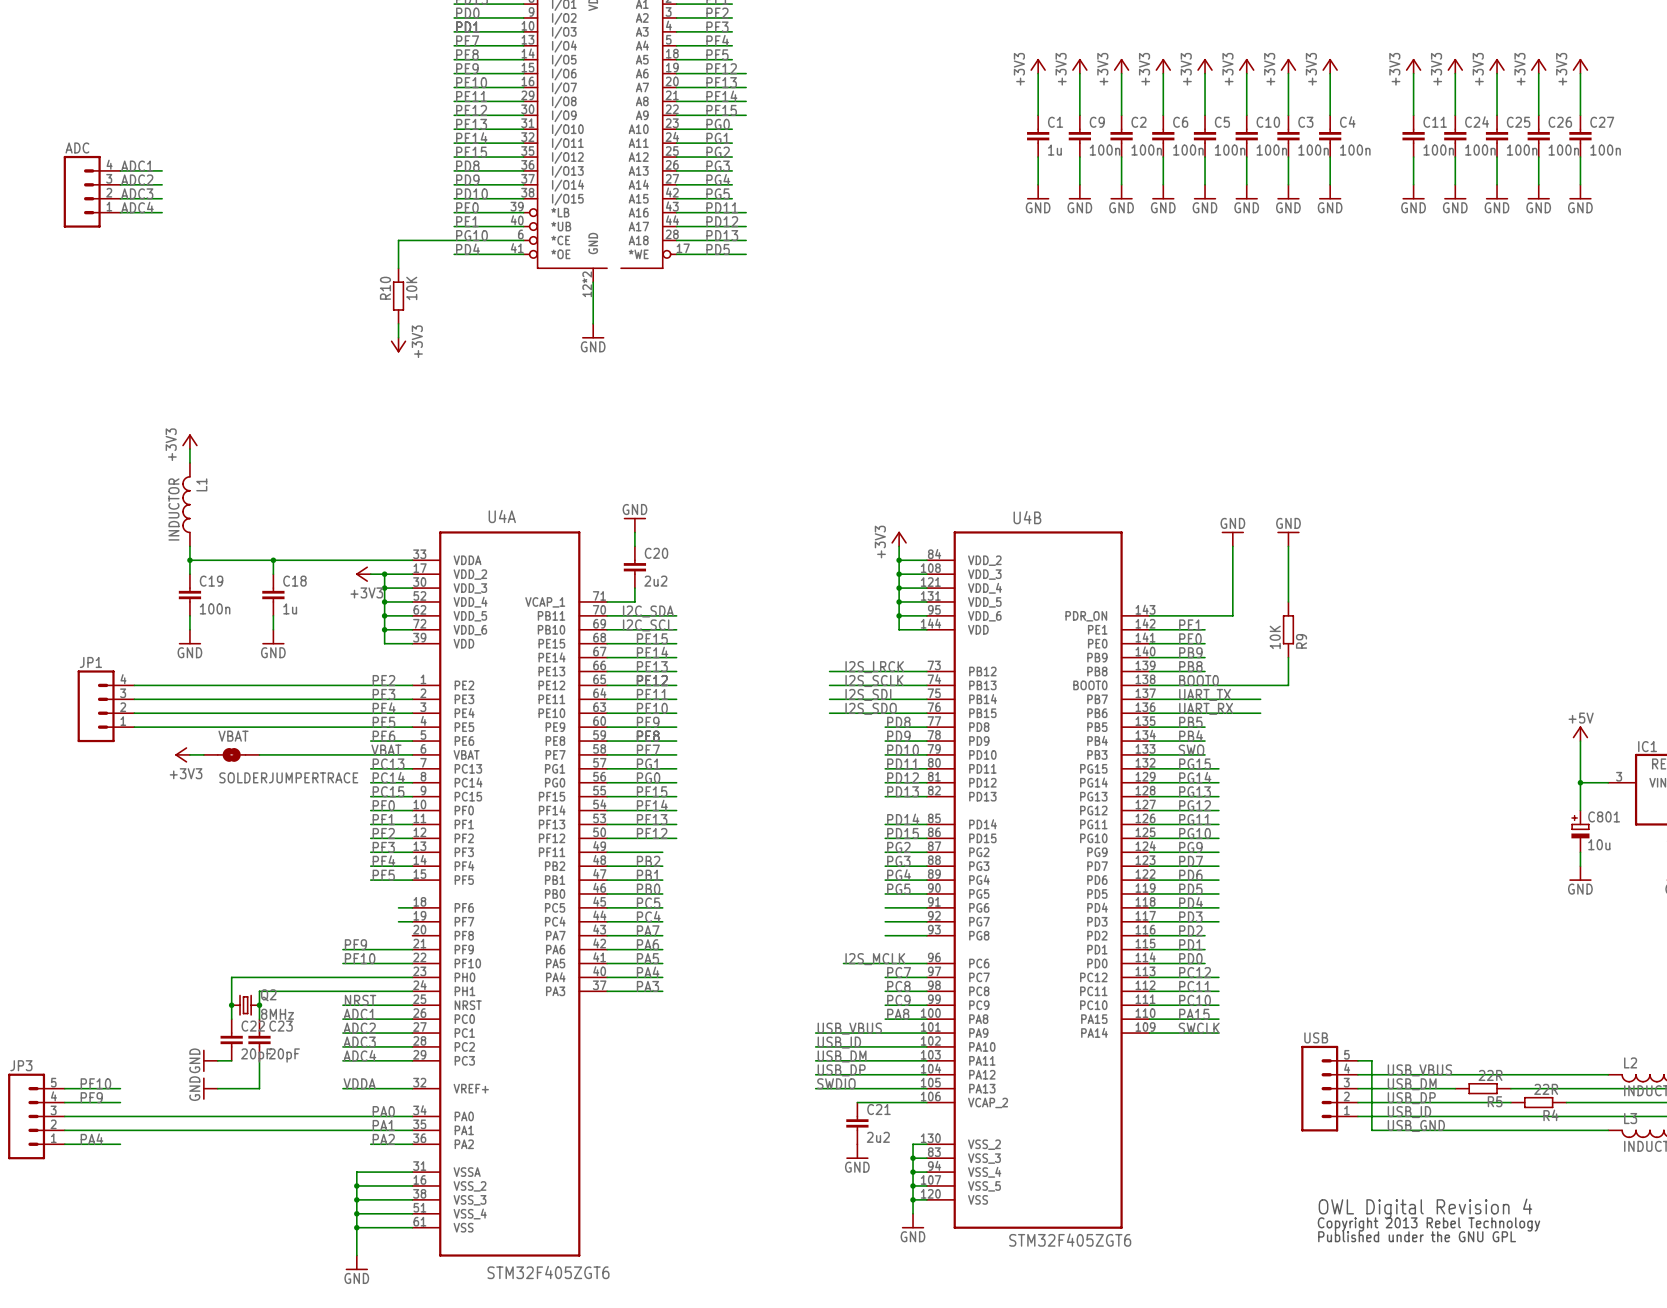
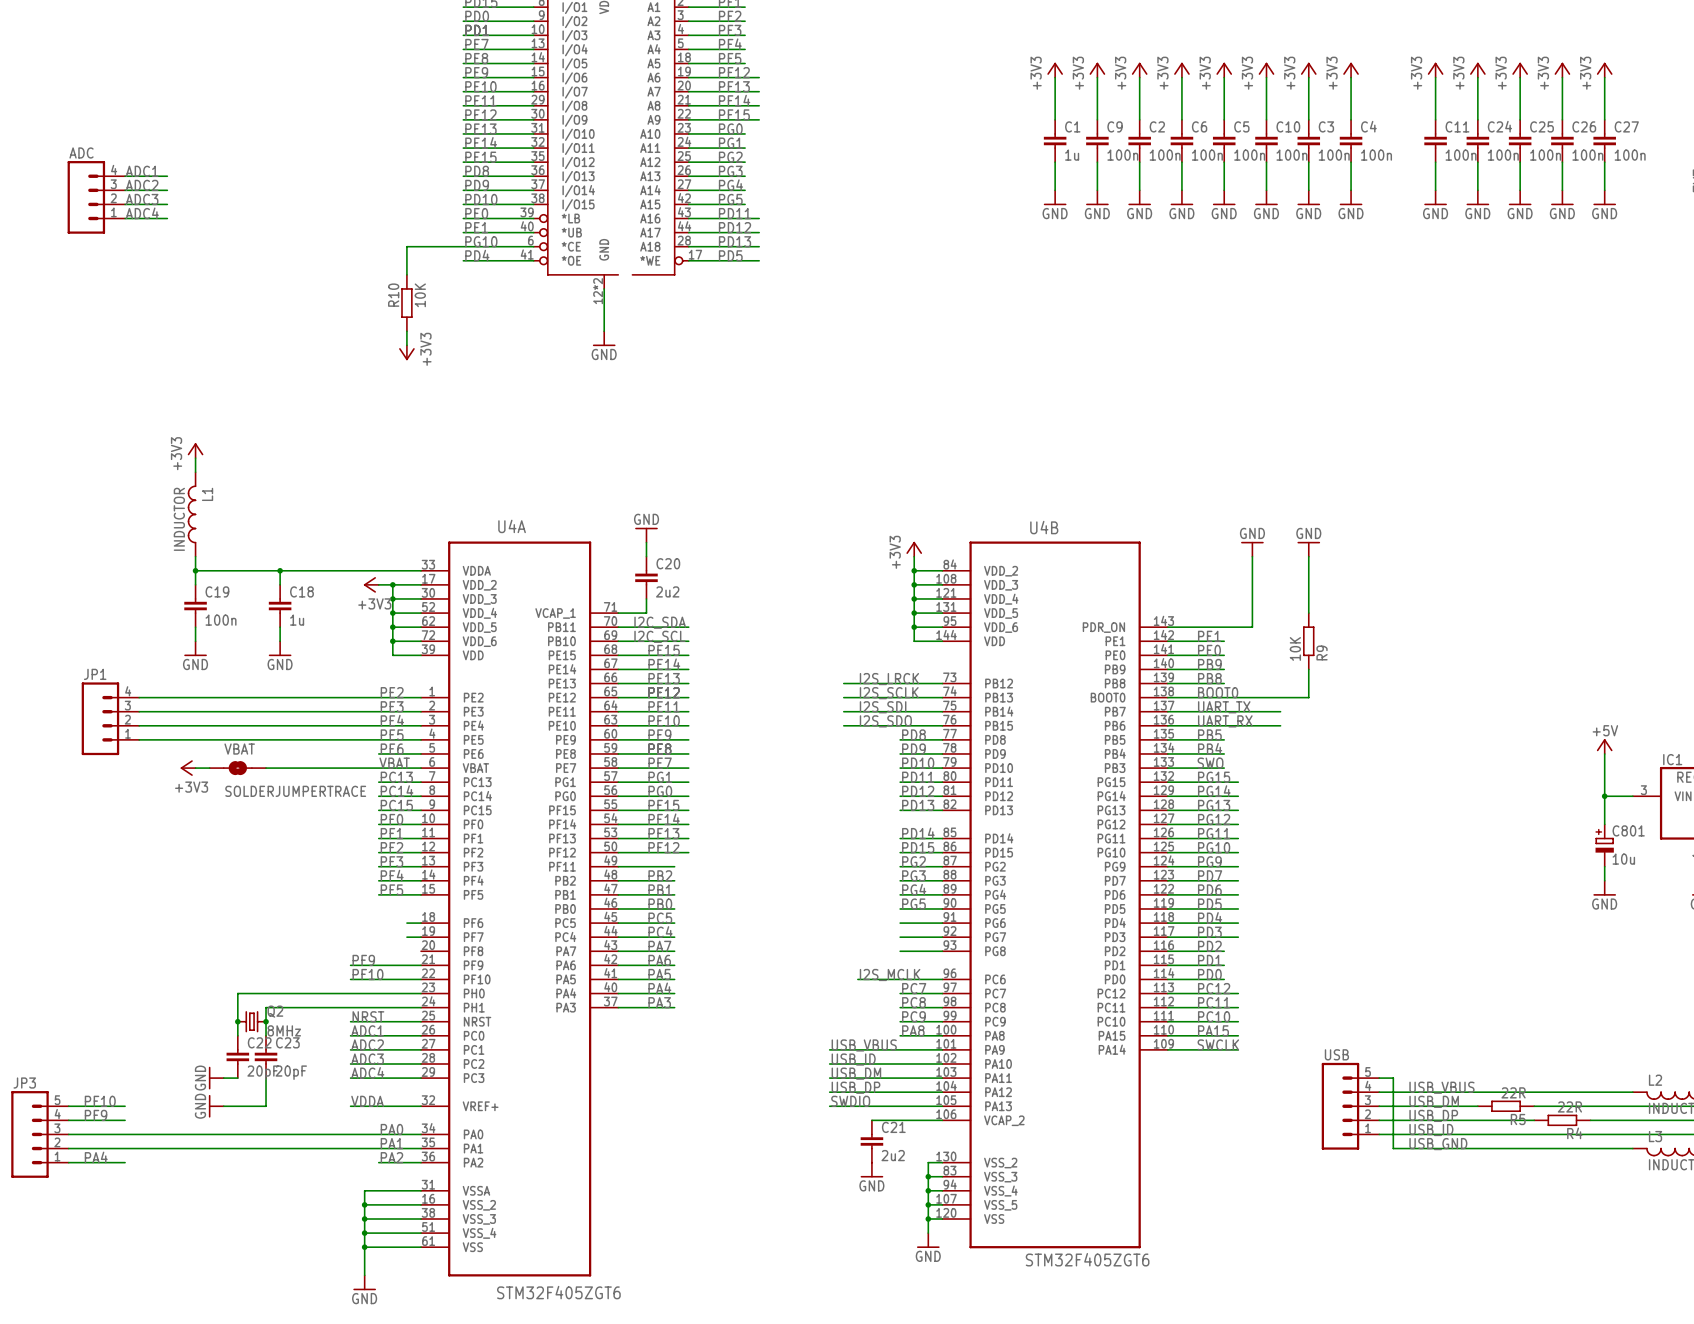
text: OWL Digital Revision 4 (1425, 1208) -> none
text: Copyright 2013 Rebel Technology (1428, 1224) -> none
text: Published under the GNU GPL (1417, 1236) -> none

